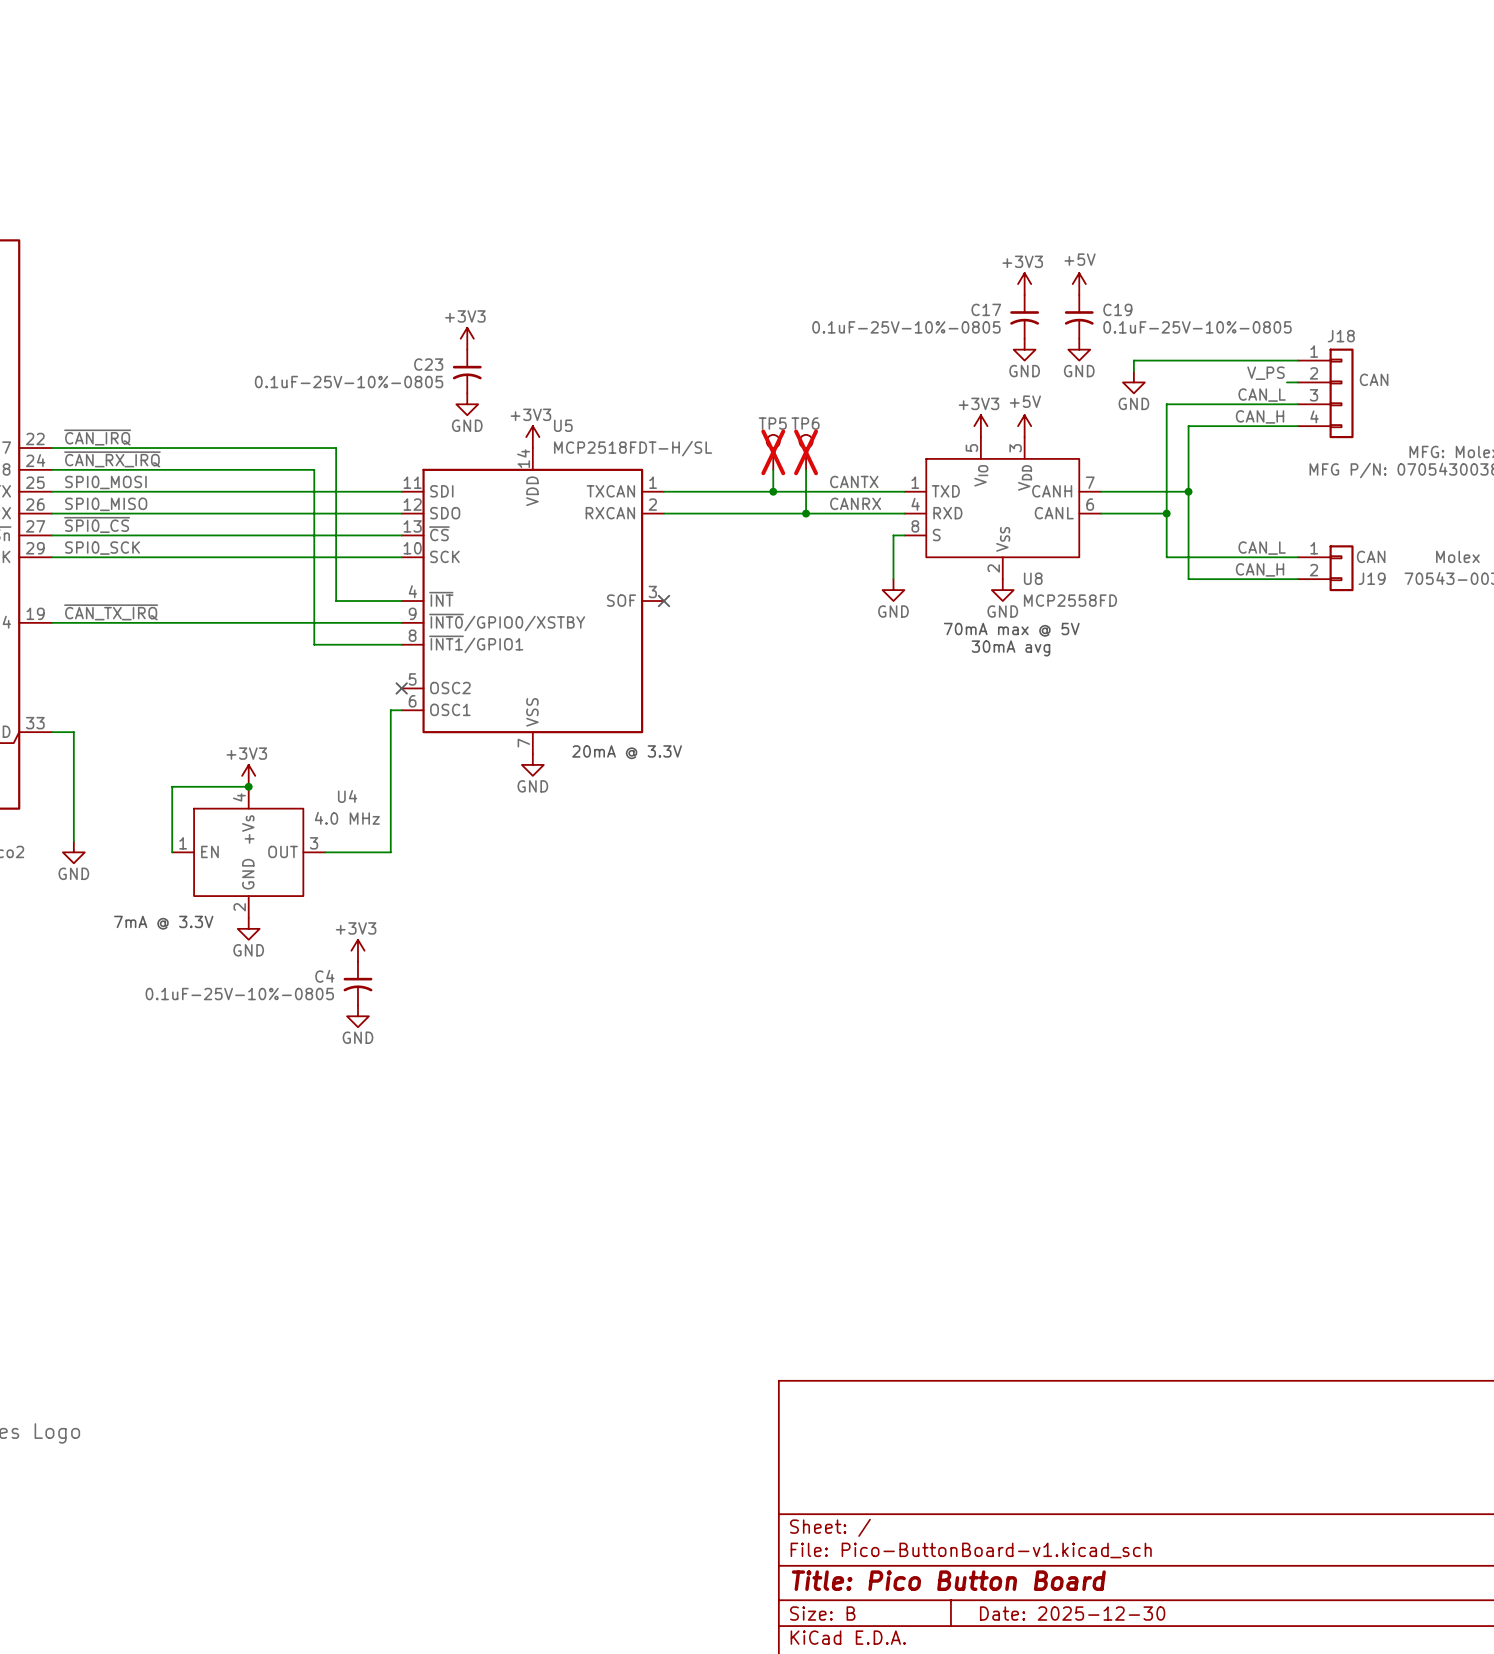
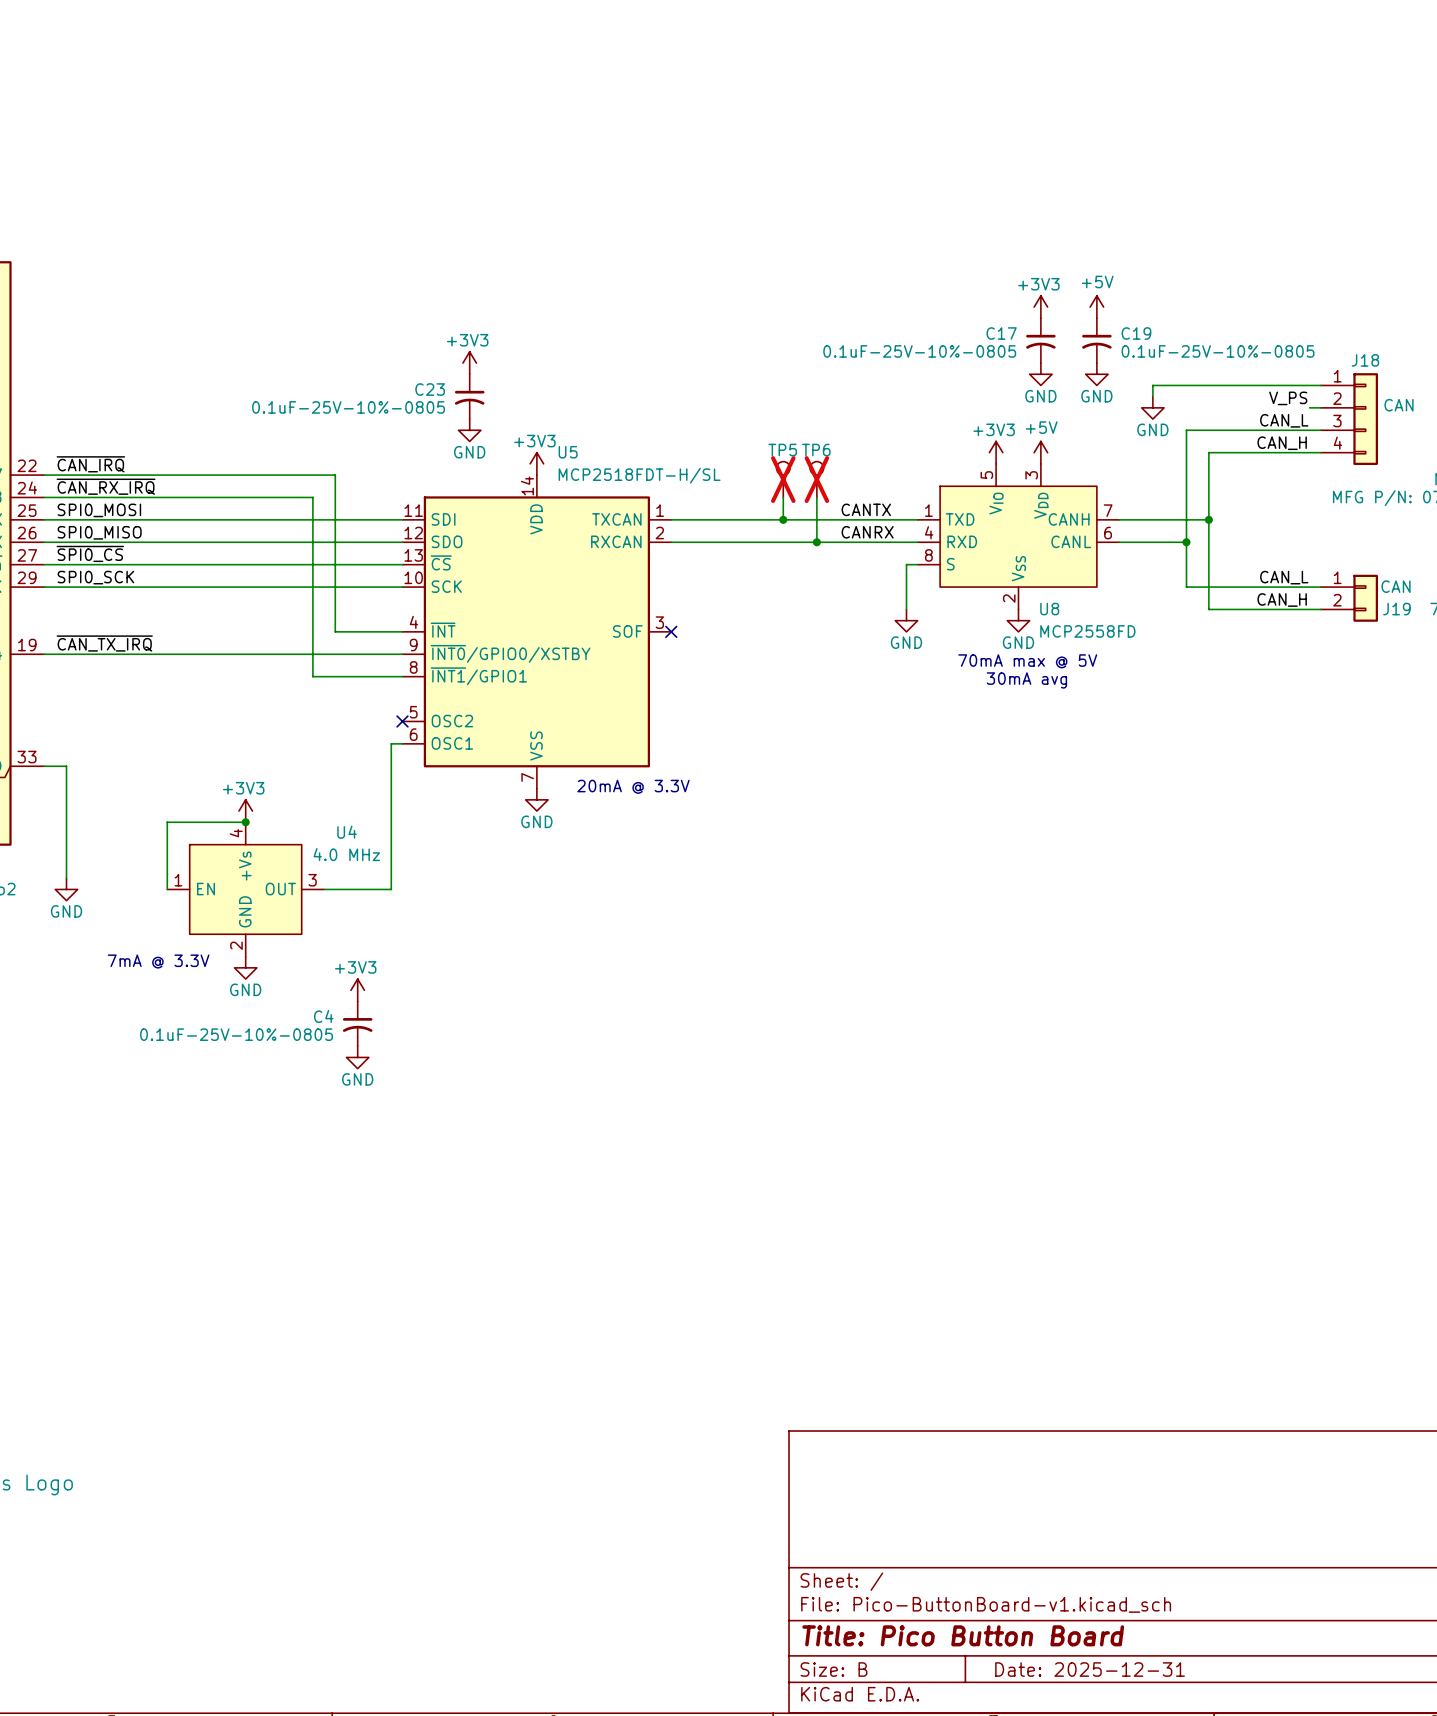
title block: Date: 2025-12-30 (1072, 1613) -> Date: 2025-12-31 (1090, 1669)

